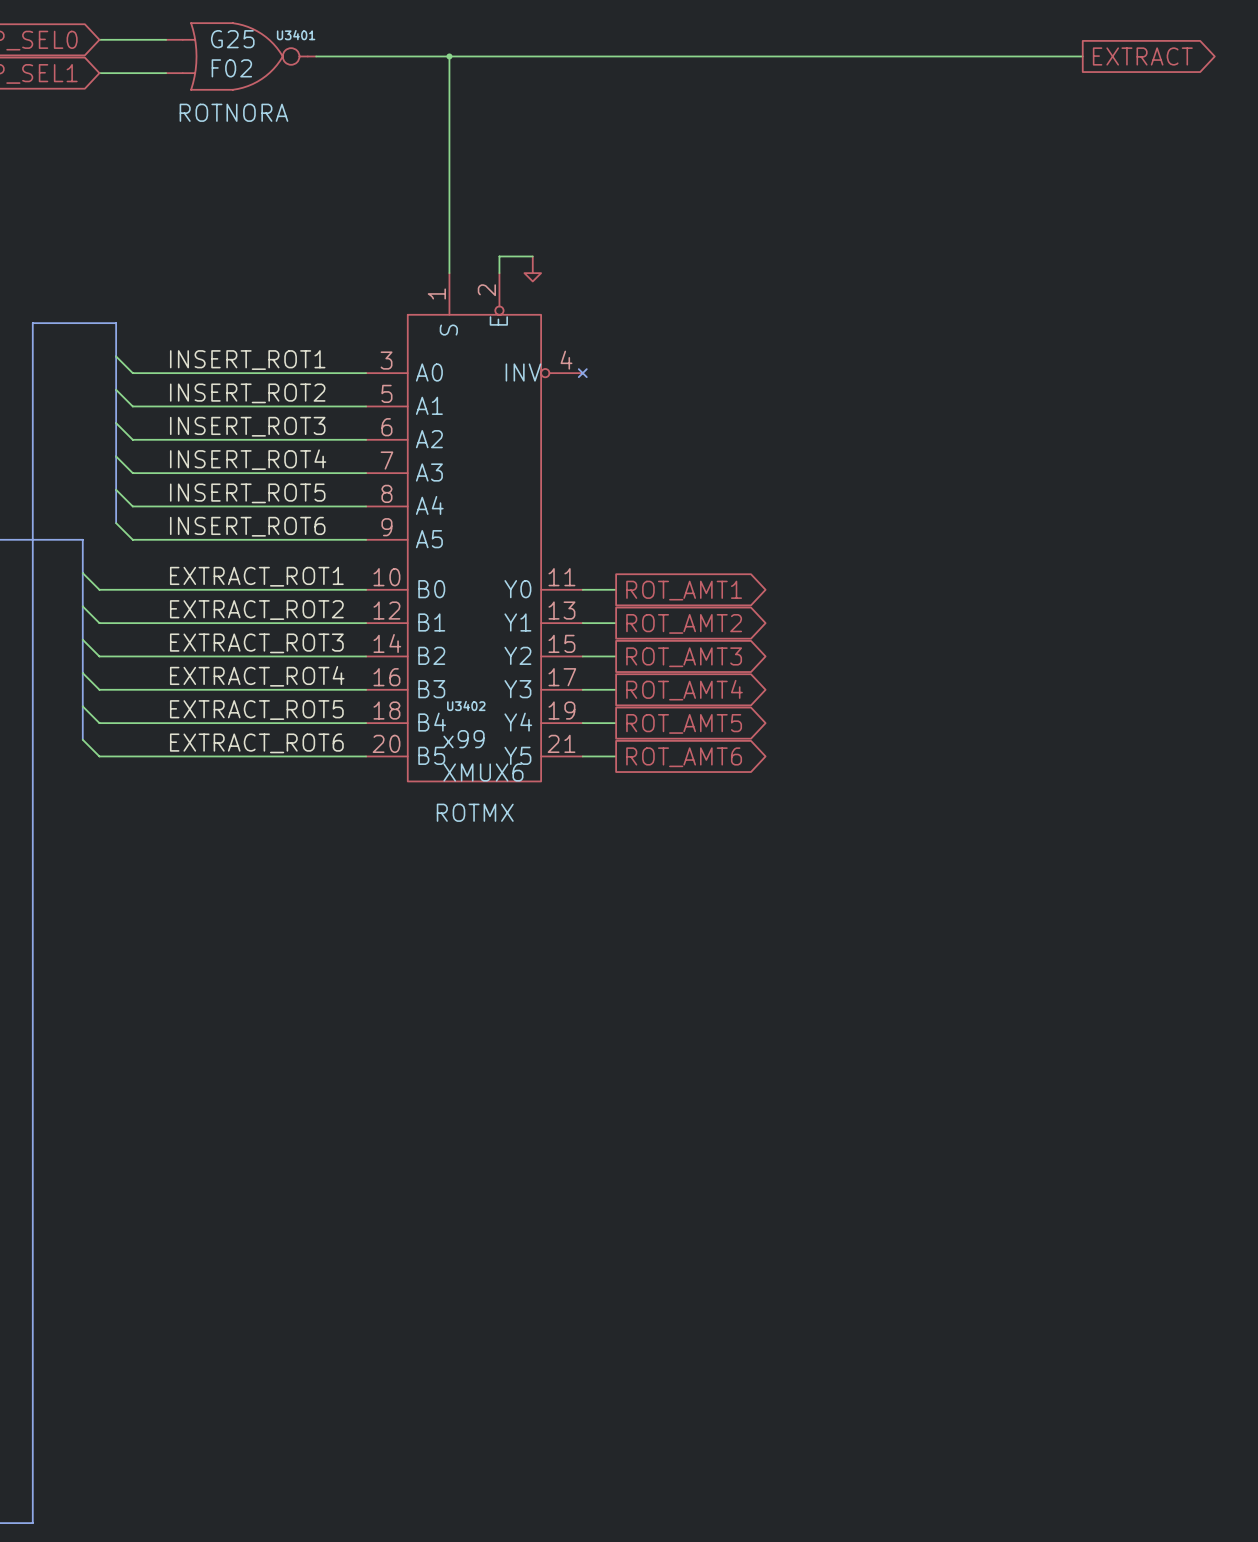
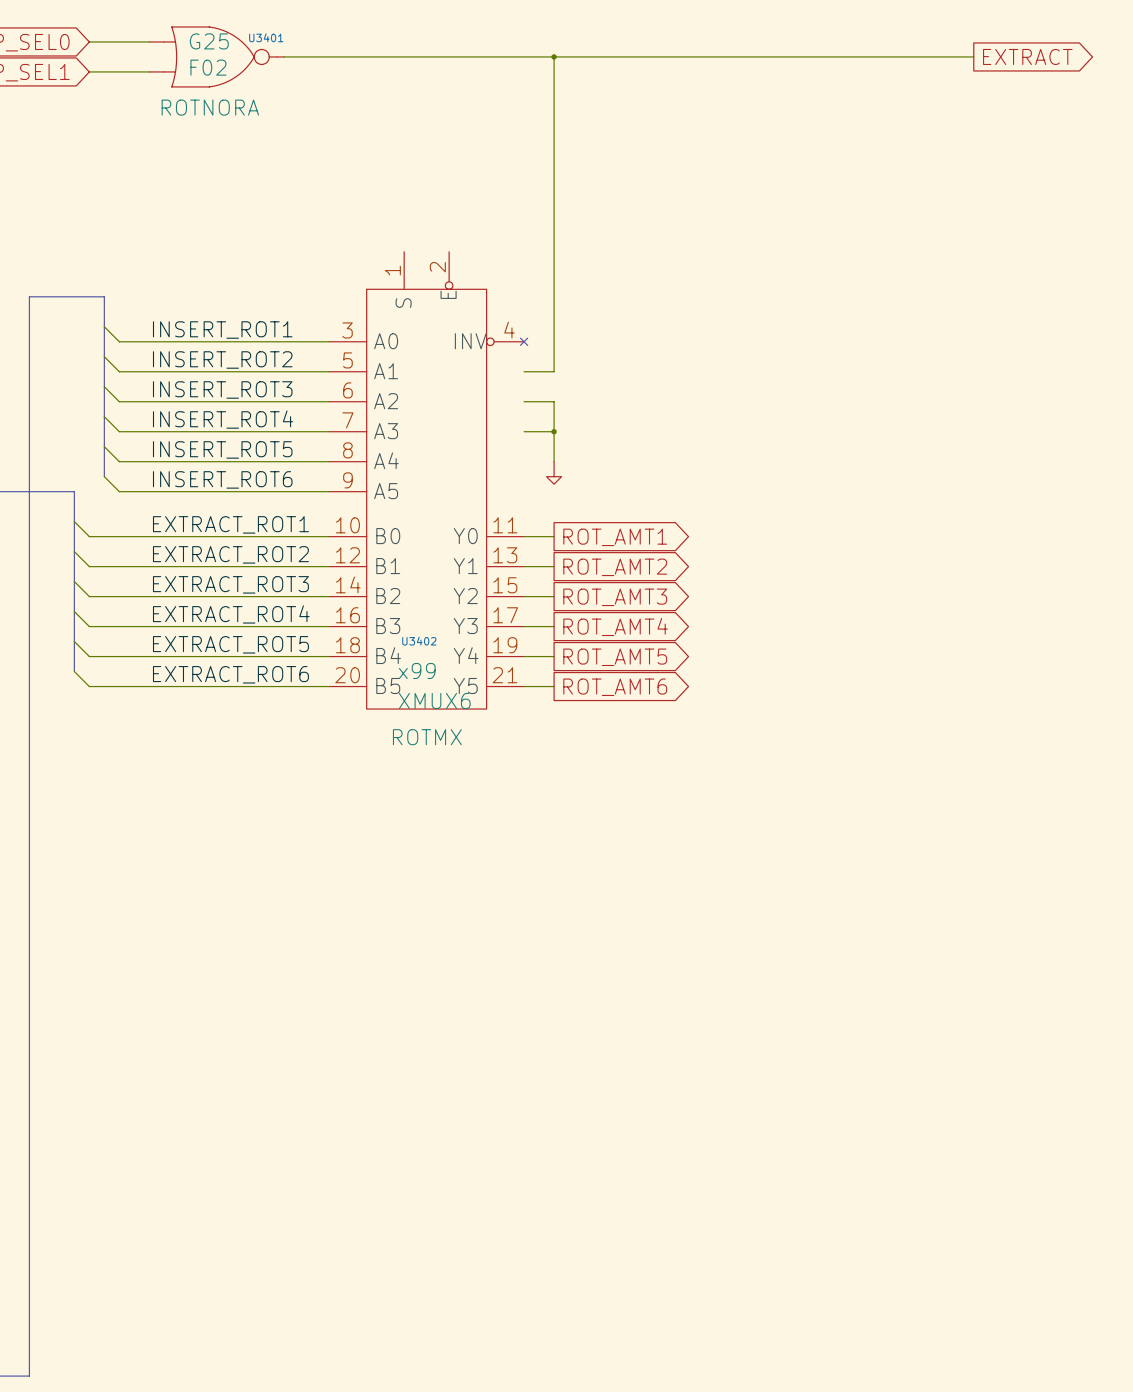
wire: (449, 56) (449, 273) -> none
junction: (449, 56) -> none
wire: none -> (554, 56) (554, 371) (524, 371)
junction: none -> (554, 56)
wire: (532, 256) (499, 256) (499, 273) -> none
power symbol: (532, 269) -> none
wire: none -> (524, 401) (554, 401) (554, 461)
wire: none -> (524, 431) (554, 431)
junction: none -> (554, 431)
power symbol: none -> (554, 473)

